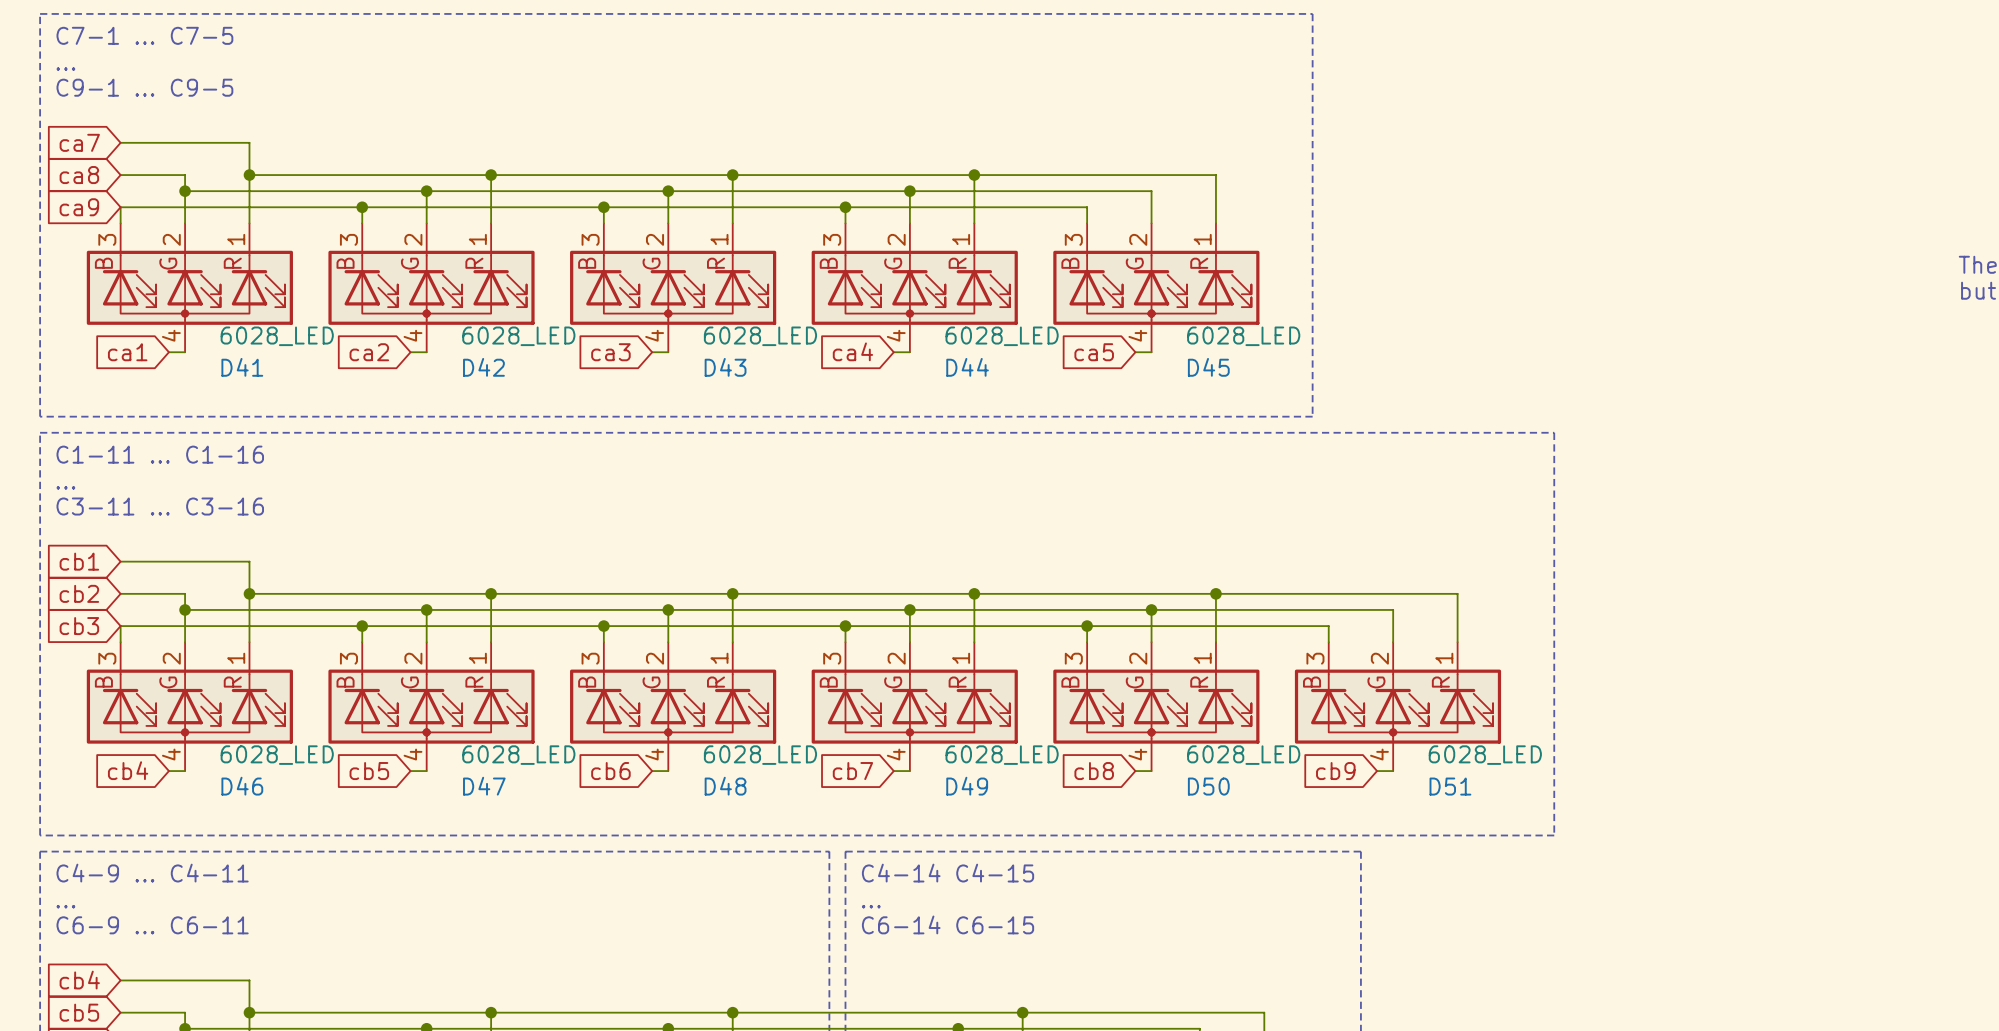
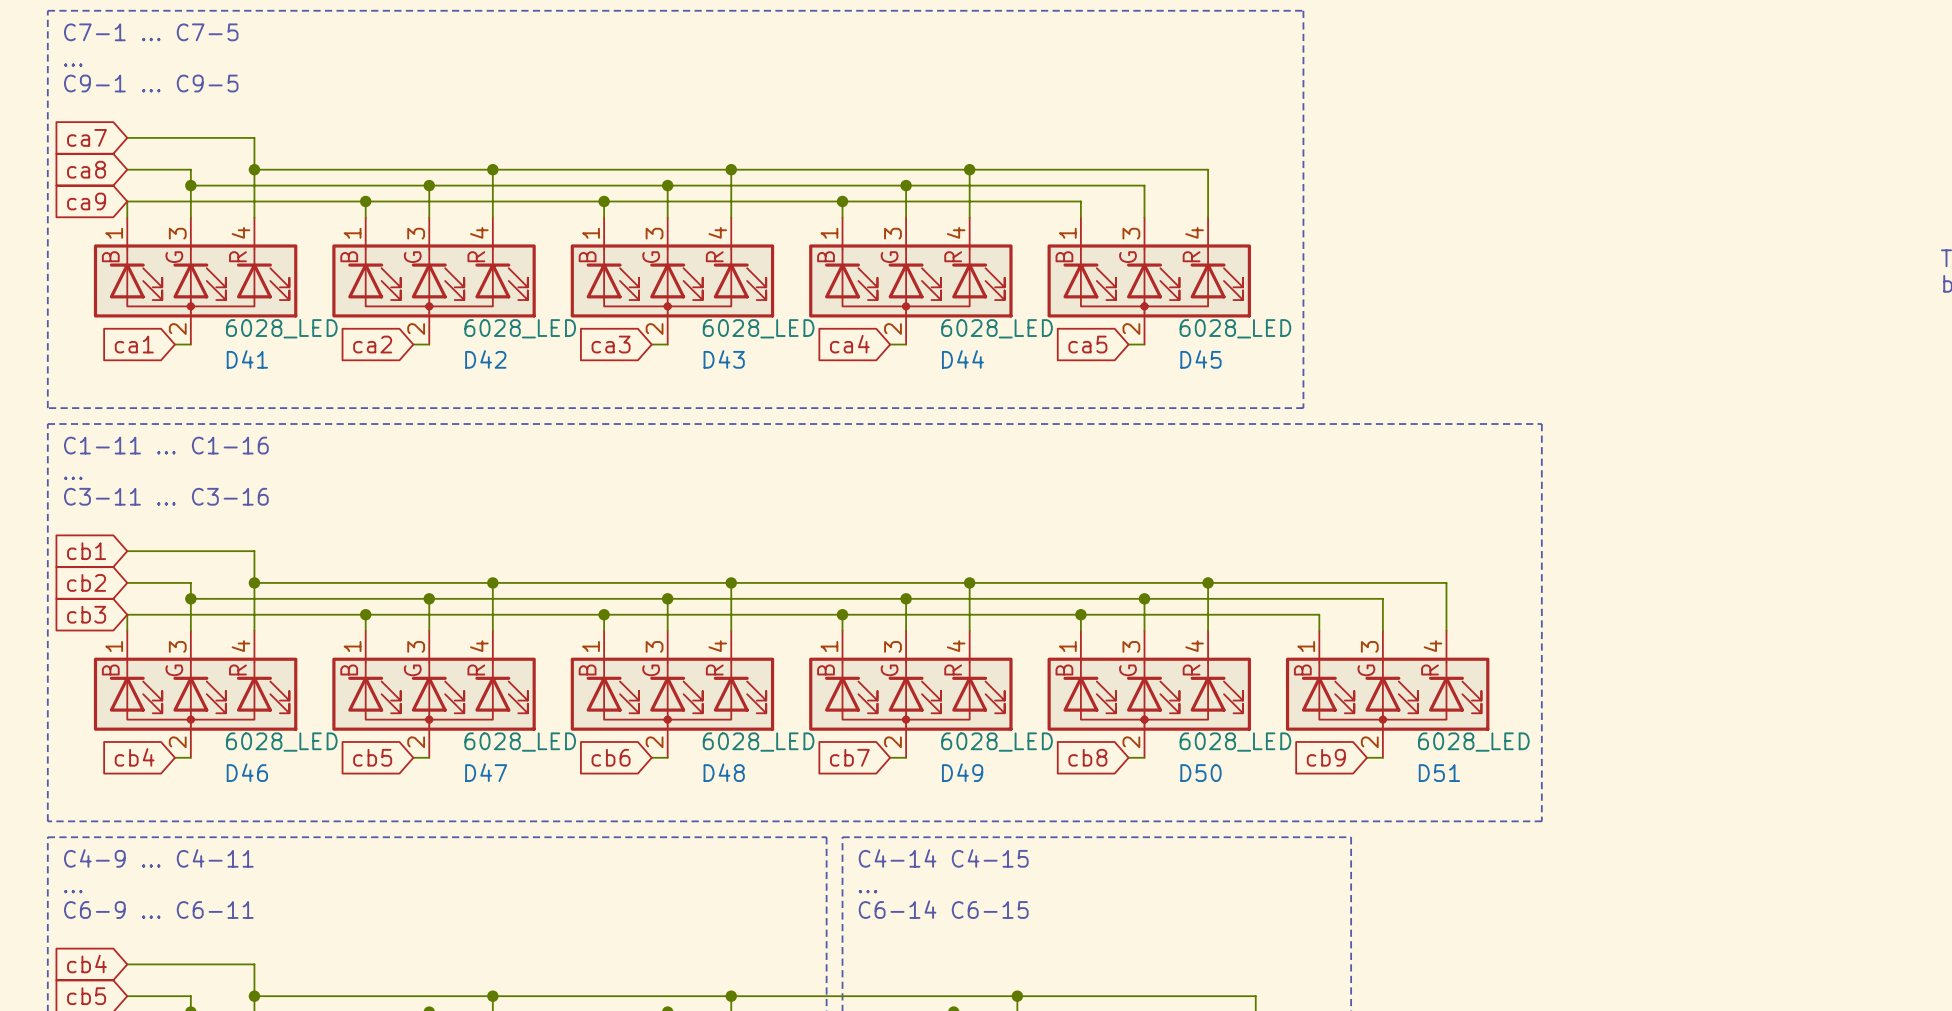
D41 pin number: 3 (107, 239) -> 1 (114, 233)
D41 pin number: 2 (171, 239) -> 3 (177, 233)
D41 pin number: 1 (236, 239) -> 4 (240, 232)
D42 pin number: 3 (348, 239) -> 1 (352, 233)
D42 pin number: 2 (413, 239) -> 3 (416, 233)
D42 pin number: 1 (477, 239) -> 4 (479, 232)
D43 pin number: 3 (590, 239) -> 1 (590, 233)
D43 pin number: 2 (655, 239) -> 3 (654, 233)
D43 pin number: 1 (719, 239) -> 4 (717, 232)
D44 pin number: 3 (832, 239) -> 1 (829, 233)
D44 pin number: 2 (896, 239) -> 3 (892, 233)
D44 pin number: 1 (961, 239) -> 4 (956, 232)
D45 pin number: 3 (1073, 239) -> 1 (1067, 233)
D45 pin number: 2 (1138, 239) -> 3 (1131, 233)
D45 pin number: 1 (1202, 239) -> 4 (1194, 232)
D41 pin number: 4 (171, 335) -> 2 (177, 329)
D42 pin number: 4 (413, 335) -> 2 (416, 329)
D43 pin number: 4 (654, 335) -> 2 (654, 329)
D44 pin number: 4 (896, 335) -> 2 (892, 329)
D45 pin number: 4 (1137, 335) -> 2 (1131, 329)
D46 pin number: 3 (107, 658) -> 1 (114, 646)
D46 pin number: 2 (171, 658) -> 3 (177, 646)
D46 pin number: 1 (236, 658) -> 4 (240, 646)
D47 pin number: 3 (348, 658) -> 1 (352, 646)
D47 pin number: 2 (413, 658) -> 3 (416, 646)
D47 pin number: 1 (477, 658) -> 4 (479, 646)
D48 pin number: 3 (590, 658) -> 1 (590, 646)
D48 pin number: 2 (655, 658) -> 3 (654, 646)
D48 pin number: 1 (719, 658) -> 4 (717, 646)
D49 pin number: 3 (832, 658) -> 1 (829, 646)
D49 pin number: 2 (896, 658) -> 3 (892, 646)
D49 pin number: 1 (961, 658) -> 4 (956, 646)
D50 pin number: 3 (1073, 658) -> 1 (1067, 646)
D50 pin number: 2 (1138, 658) -> 3 (1131, 646)
D50 pin number: 1 (1202, 658) -> 4 (1194, 646)
D51 pin number: 3 (1315, 658) -> 1 (1306, 646)
D51 pin number: 2 (1379, 658) -> 3 (1369, 646)
D51 pin number: 1 (1444, 658) -> 4 (1432, 646)
D46 pin number: 4 (171, 754) -> 2 (177, 742)
D47 pin number: 4 (413, 754) -> 2 (416, 742)
D48 pin number: 4 (654, 754) -> 2 (654, 742)
D49 pin number: 4 (896, 754) -> 2 (892, 742)
D50 pin number: 4 (1137, 754) -> 2 (1131, 742)
D51 pin number: 4 (1379, 754) -> 2 (1369, 742)

